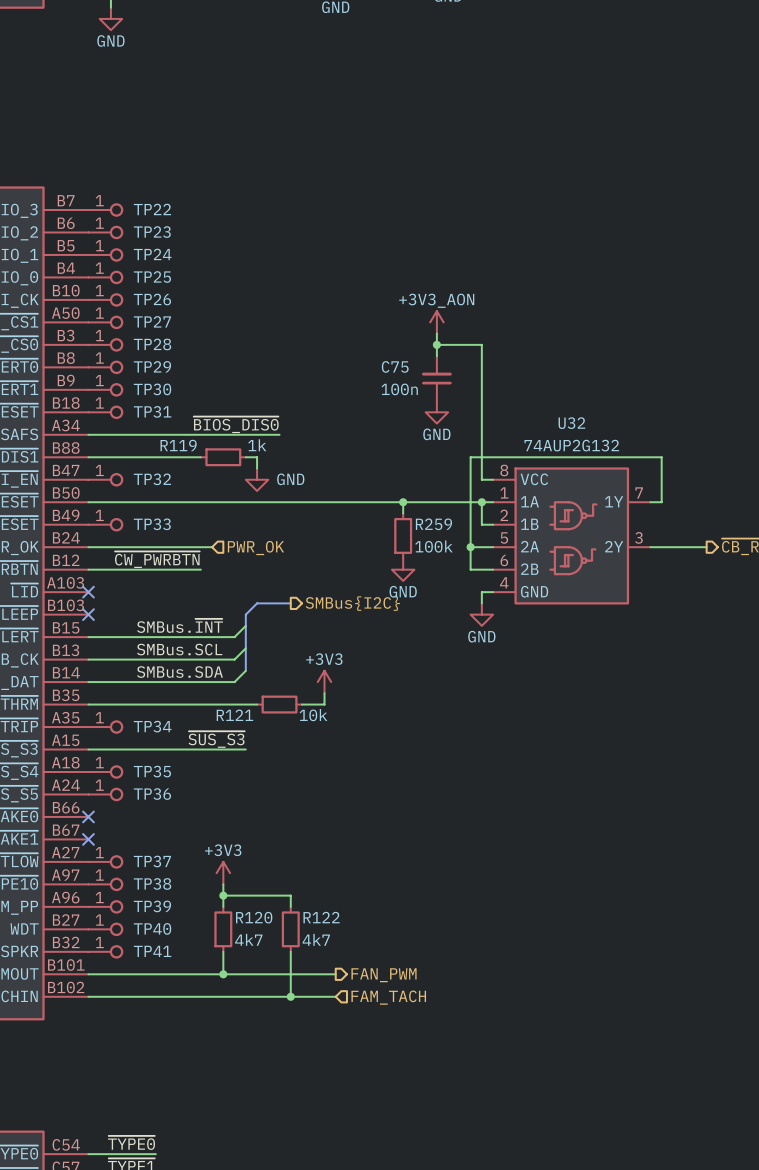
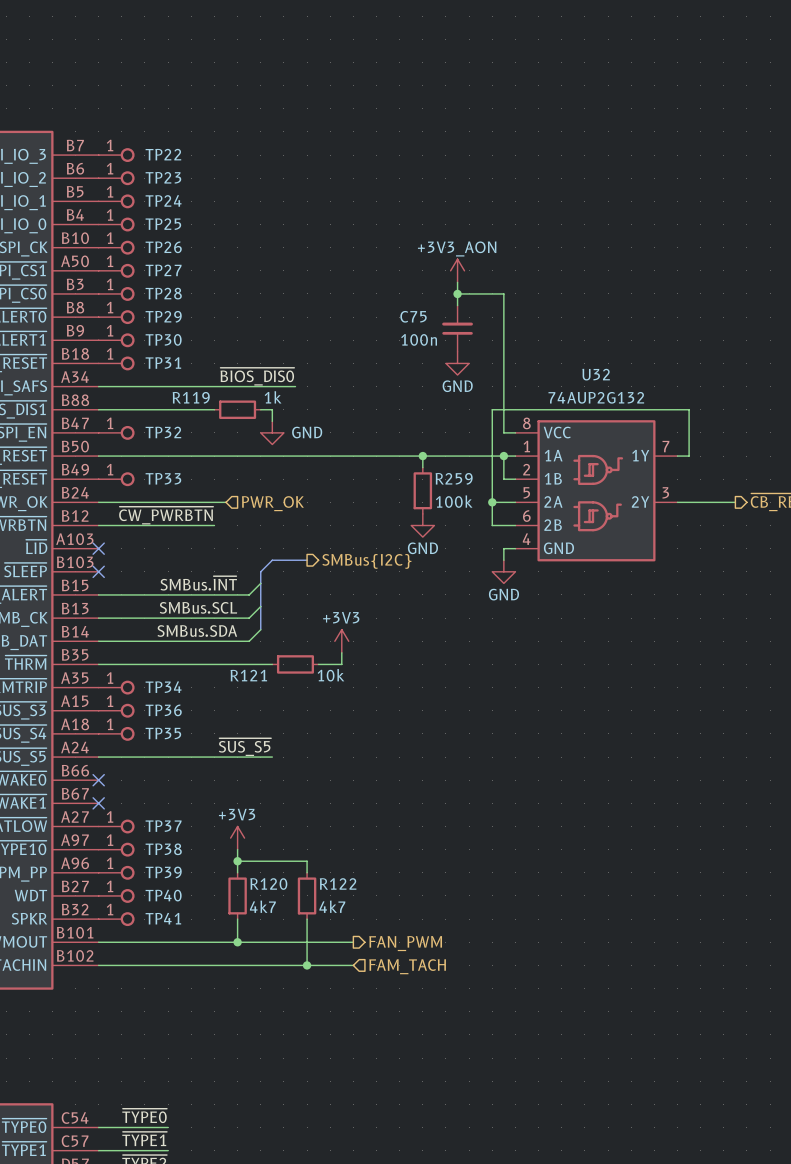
label: ~{SUS_S3} (216, 739) -> none
wire: (88, 749) (245, 749) -> none
label: none -> ~{SUS_S5} (245, 747)
wire: none -> (98, 757) (272, 757)
TP36 position: (105, 794) -> (116, 710)

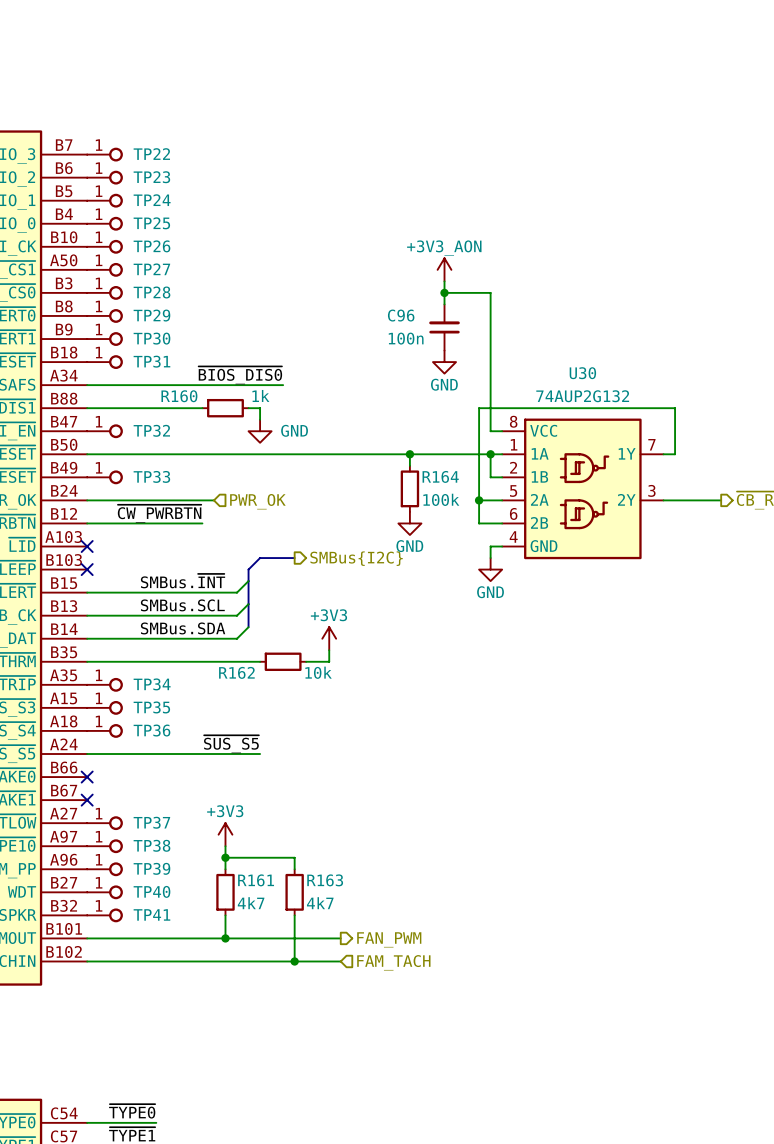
C75 name: C75 (413, 316) -> C96 (401, 315)
U32 name: U32 (596, 374) -> U30 (582, 373)
R119 name: R119 (191, 397) -> R160 (179, 396)
R259 name: R259 (454, 478) -> R164 (440, 476)
R121 name: R121 (248, 675) -> R162 (236, 672)
TP36 name: TP36 (163, 710) -> TP35 (151, 707)
TP35 name: TP35 (163, 733) -> TP36 (151, 730)
R122 name: R122 (338, 883) -> R163 (325, 880)
R120 name: R120 (268, 884) -> R161 (256, 880)

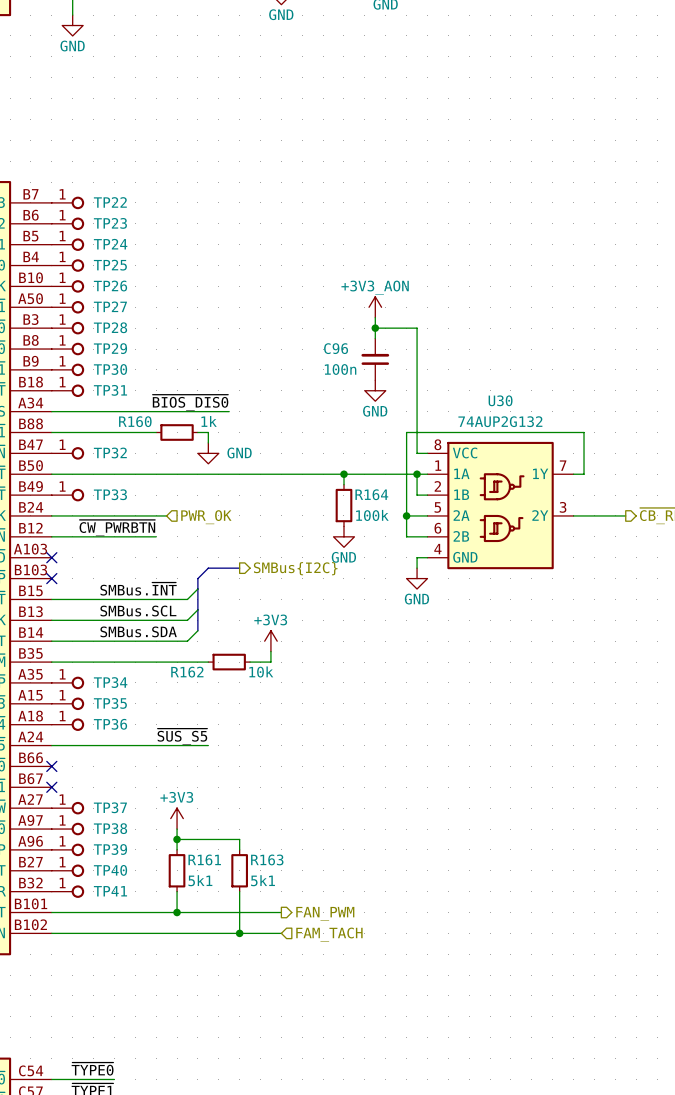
R161 text: 4k7 (251, 903) -> 5k1 (200, 880)
R163 text: 4k7 (320, 903) -> 5k1 (263, 880)

